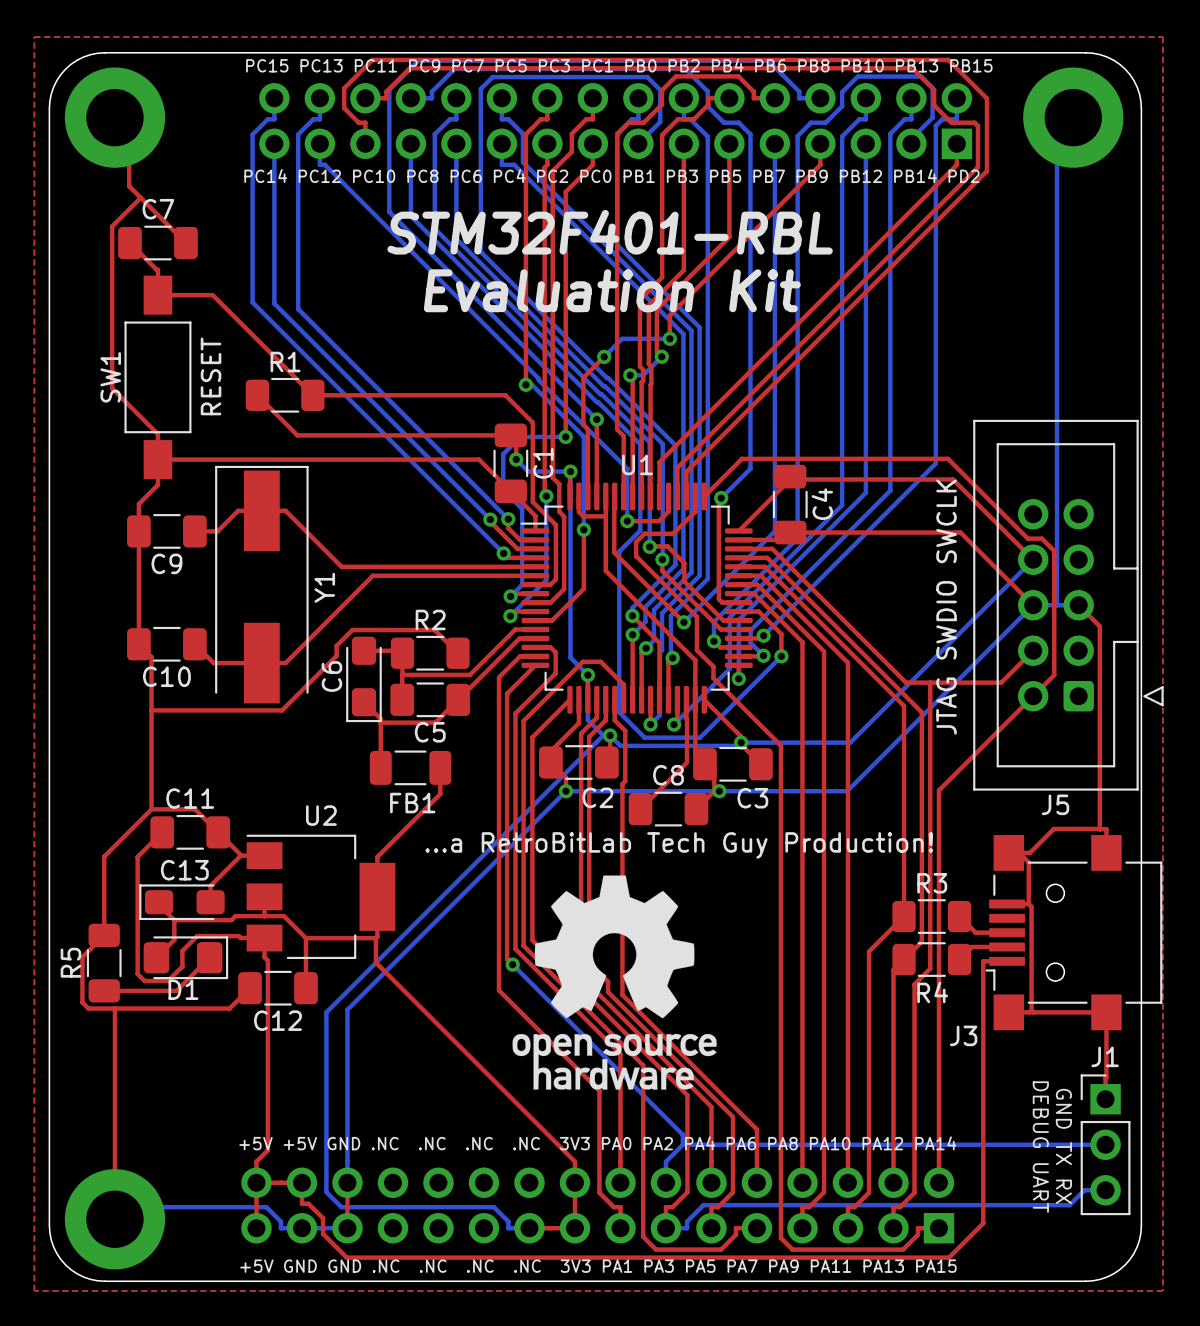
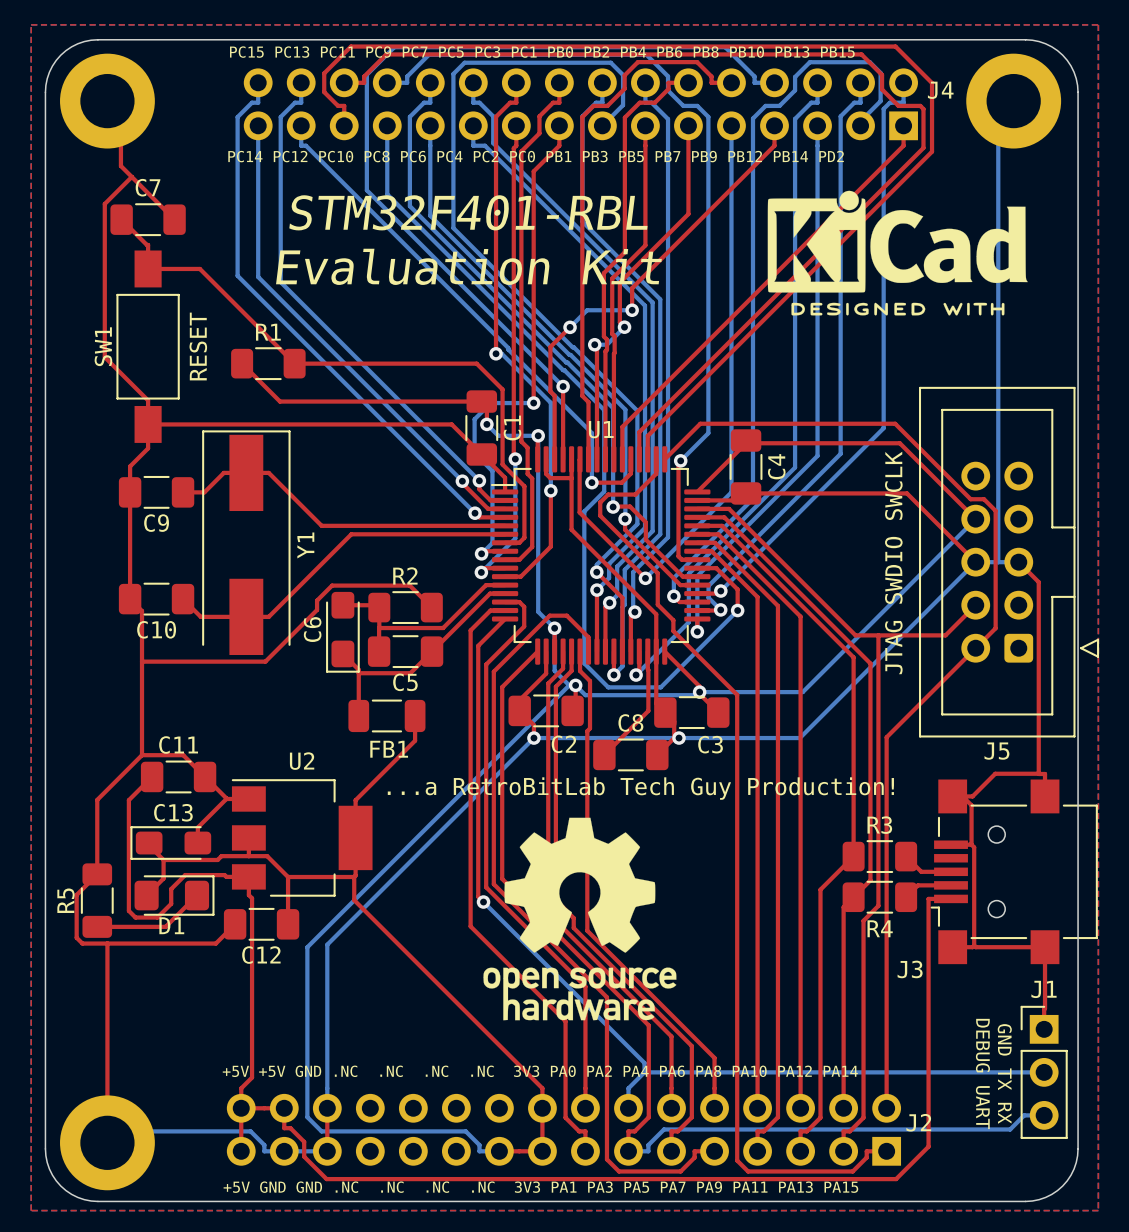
J4 name: none -> J4 (940, 90)
drawing: none -> [767, 190, 1028, 316]
text position: STM32F401-RBL (610, 232) -> STM32F401-RBL (468, 212)
text position: Evaluation Kit (612, 290) -> Evaluation Kit (468, 266)
J2 name: none -> J2 (918, 1122)

